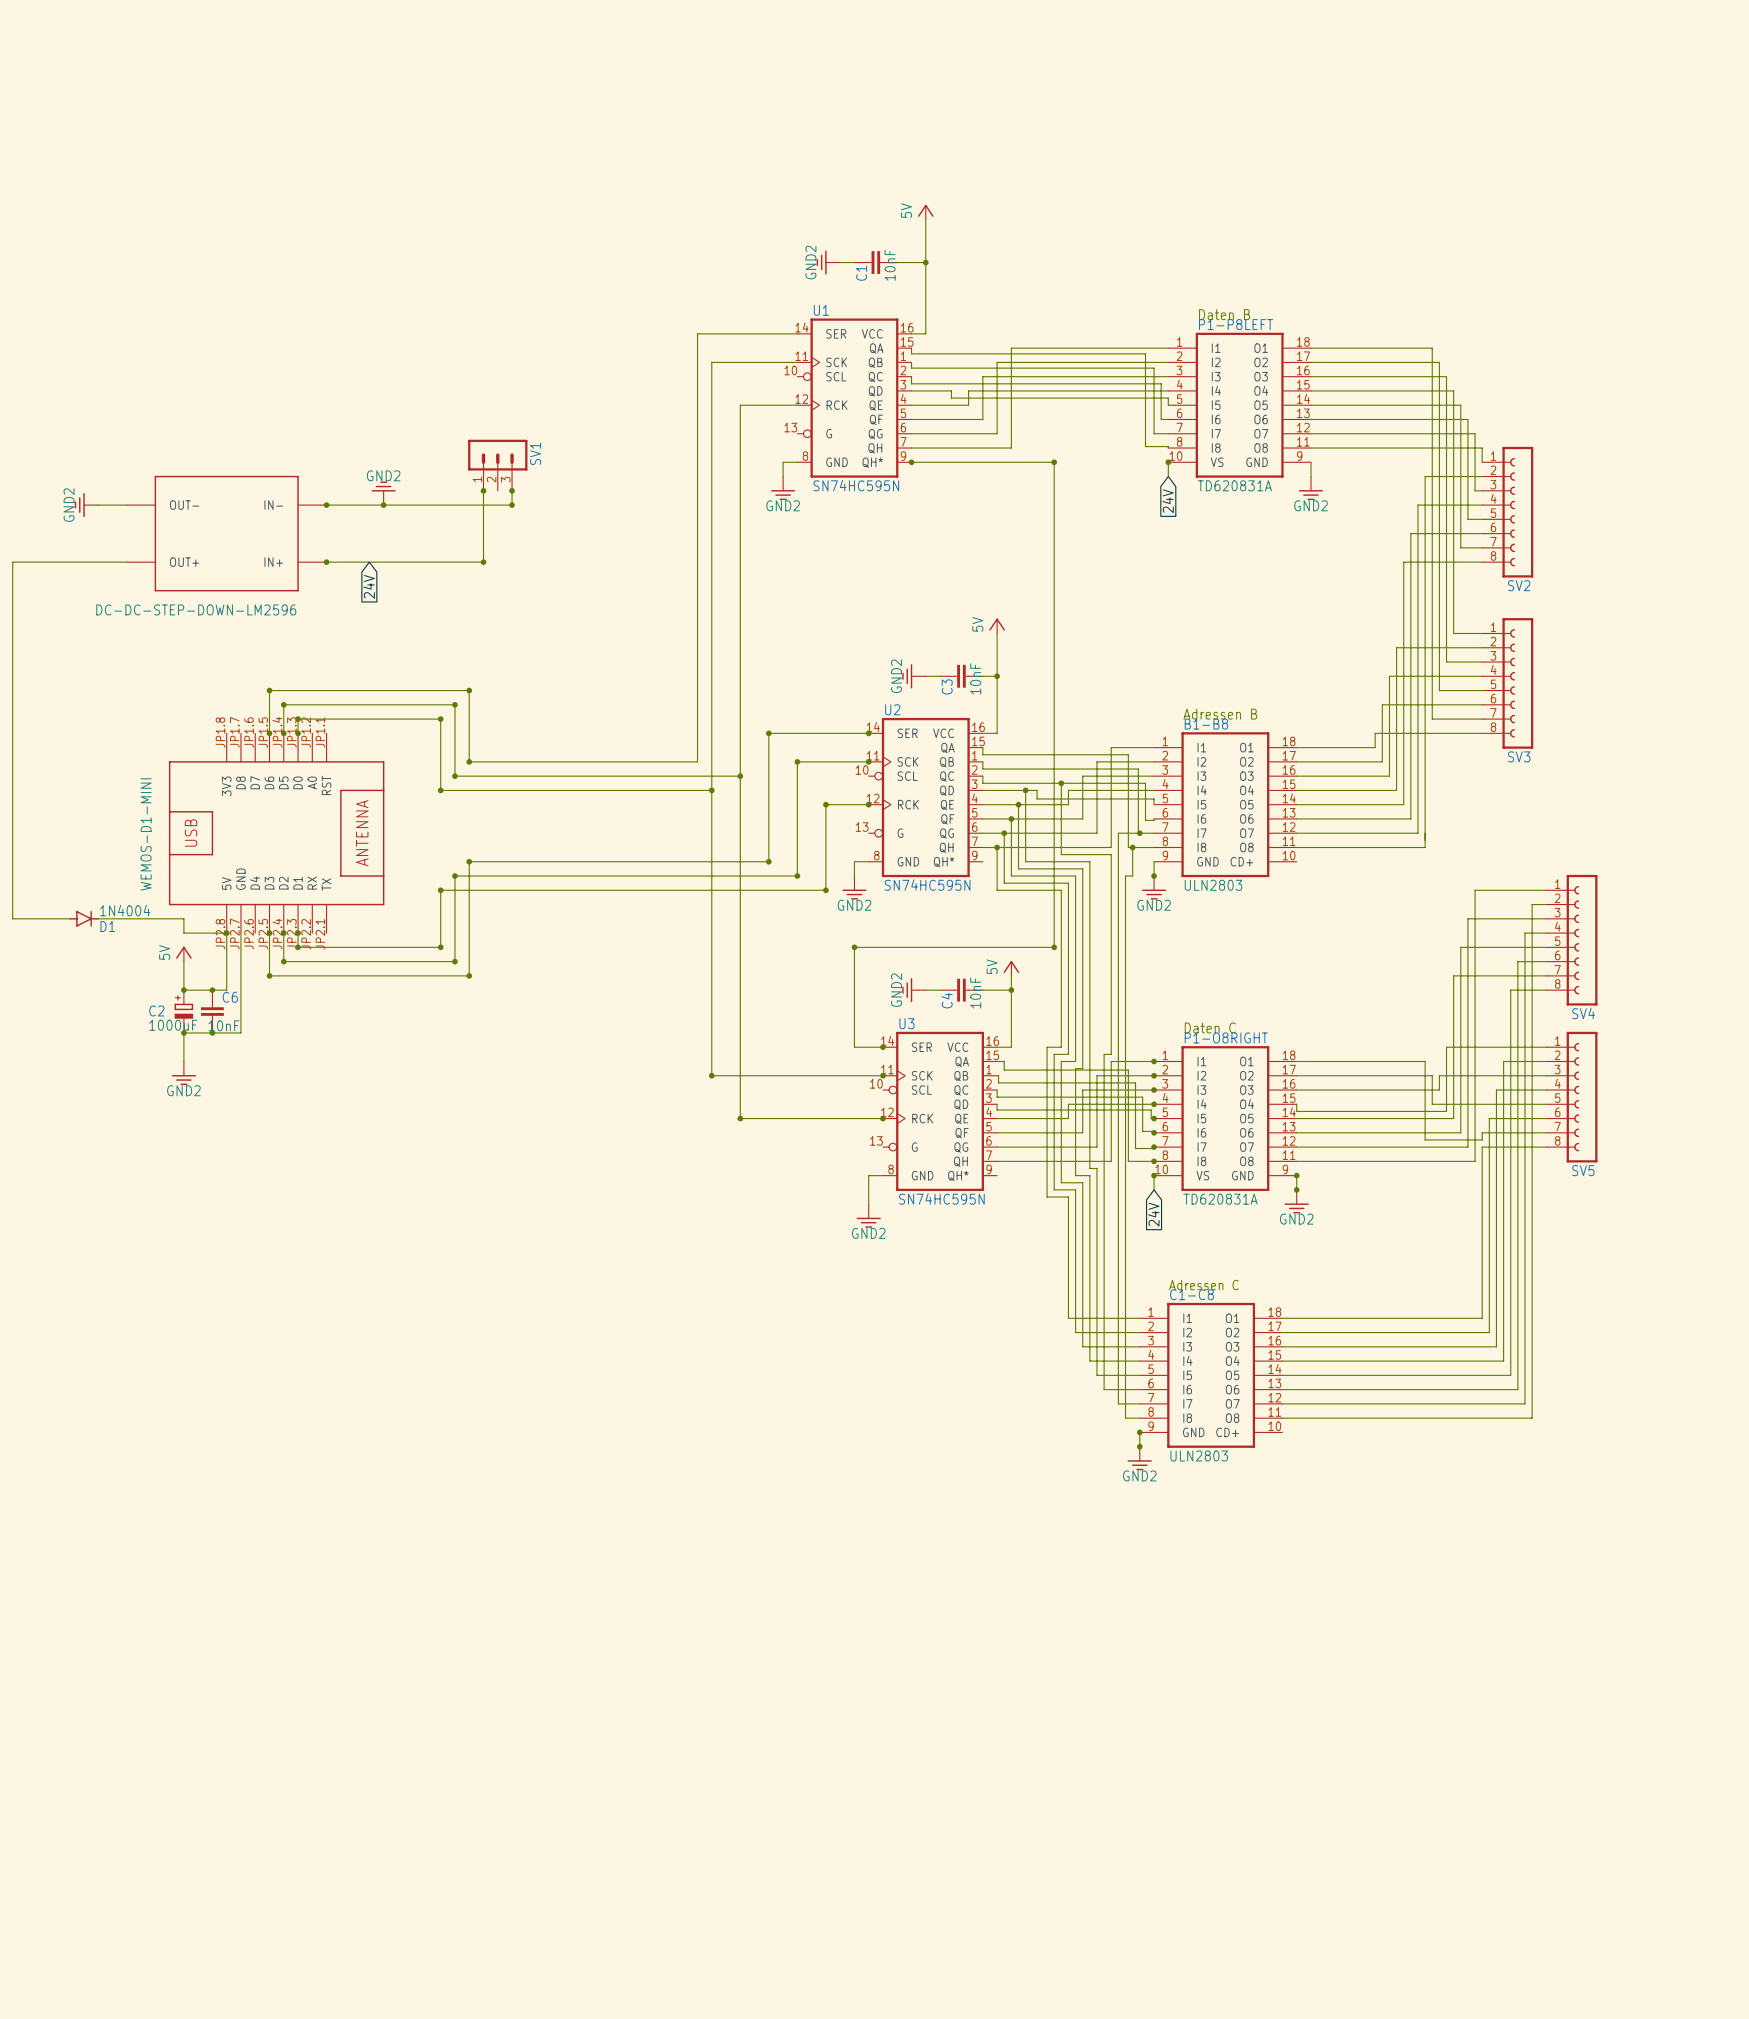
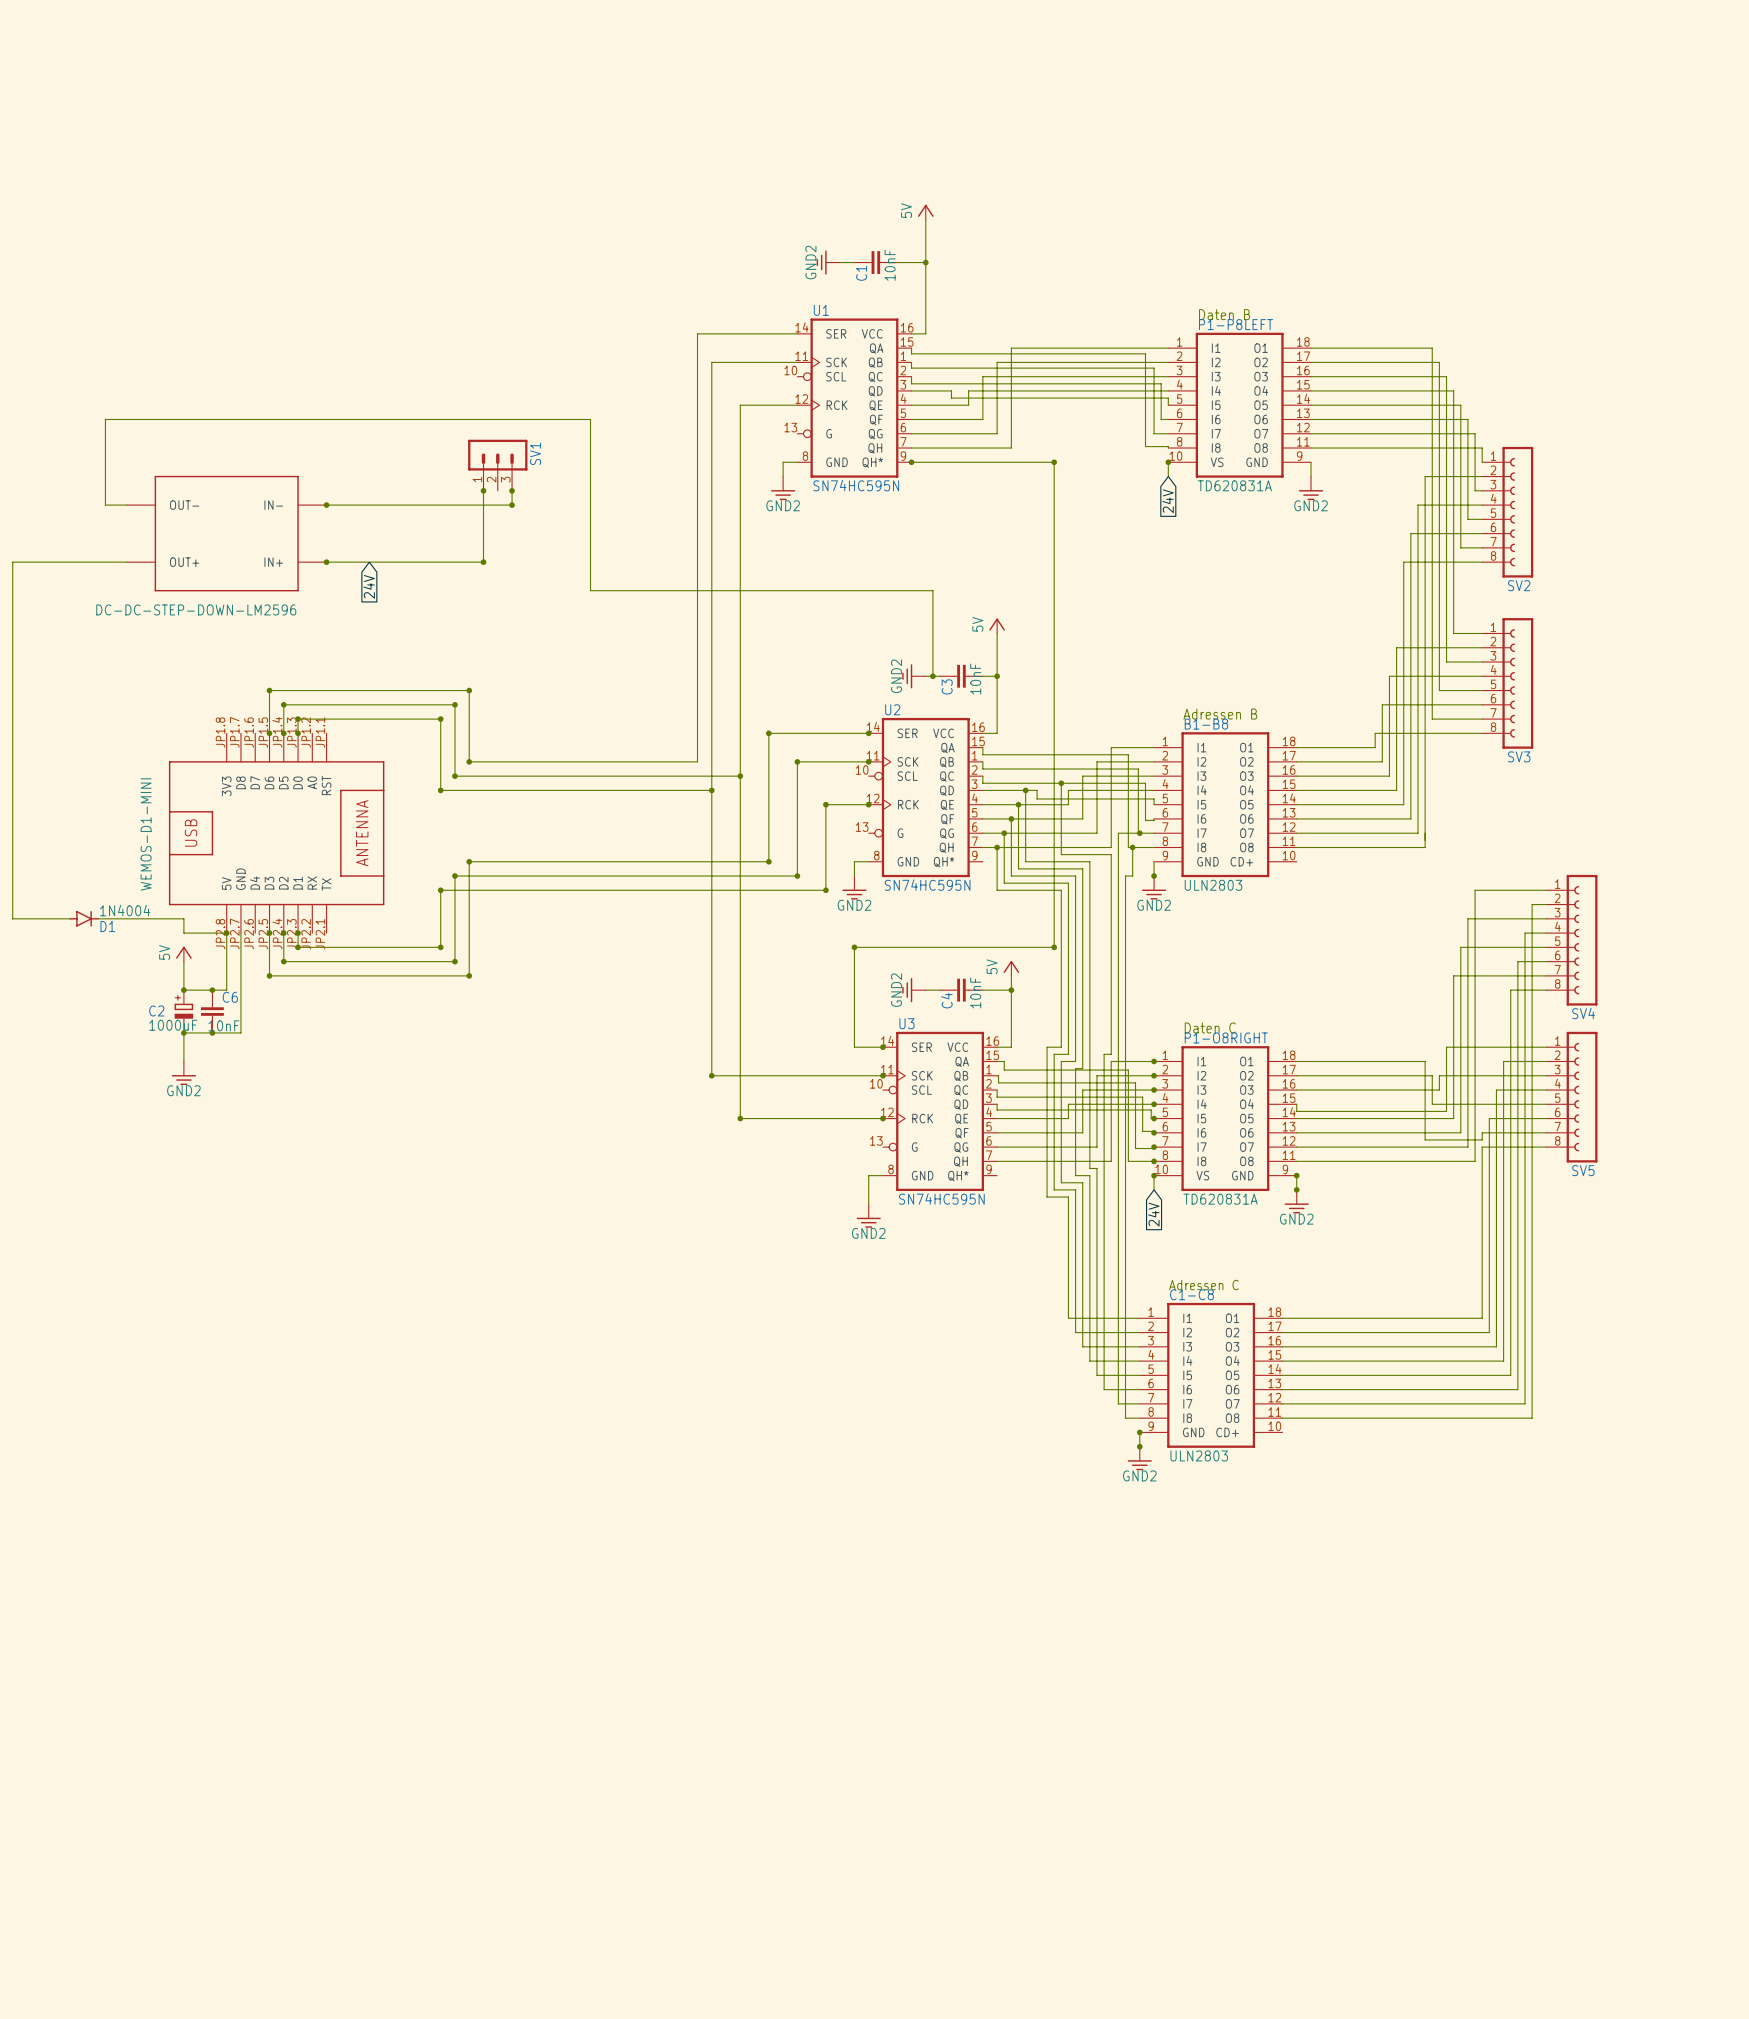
power symbol: GND2 (383, 493) -> none
power symbol: GND2 (86, 505) -> none
wire: (98, 505) (105, 505) -> (932, 676) (932, 590) (590, 590) (590, 419) (105, 419) (105, 505)
junction: (383, 505) -> none
junction: none -> (932, 676)

